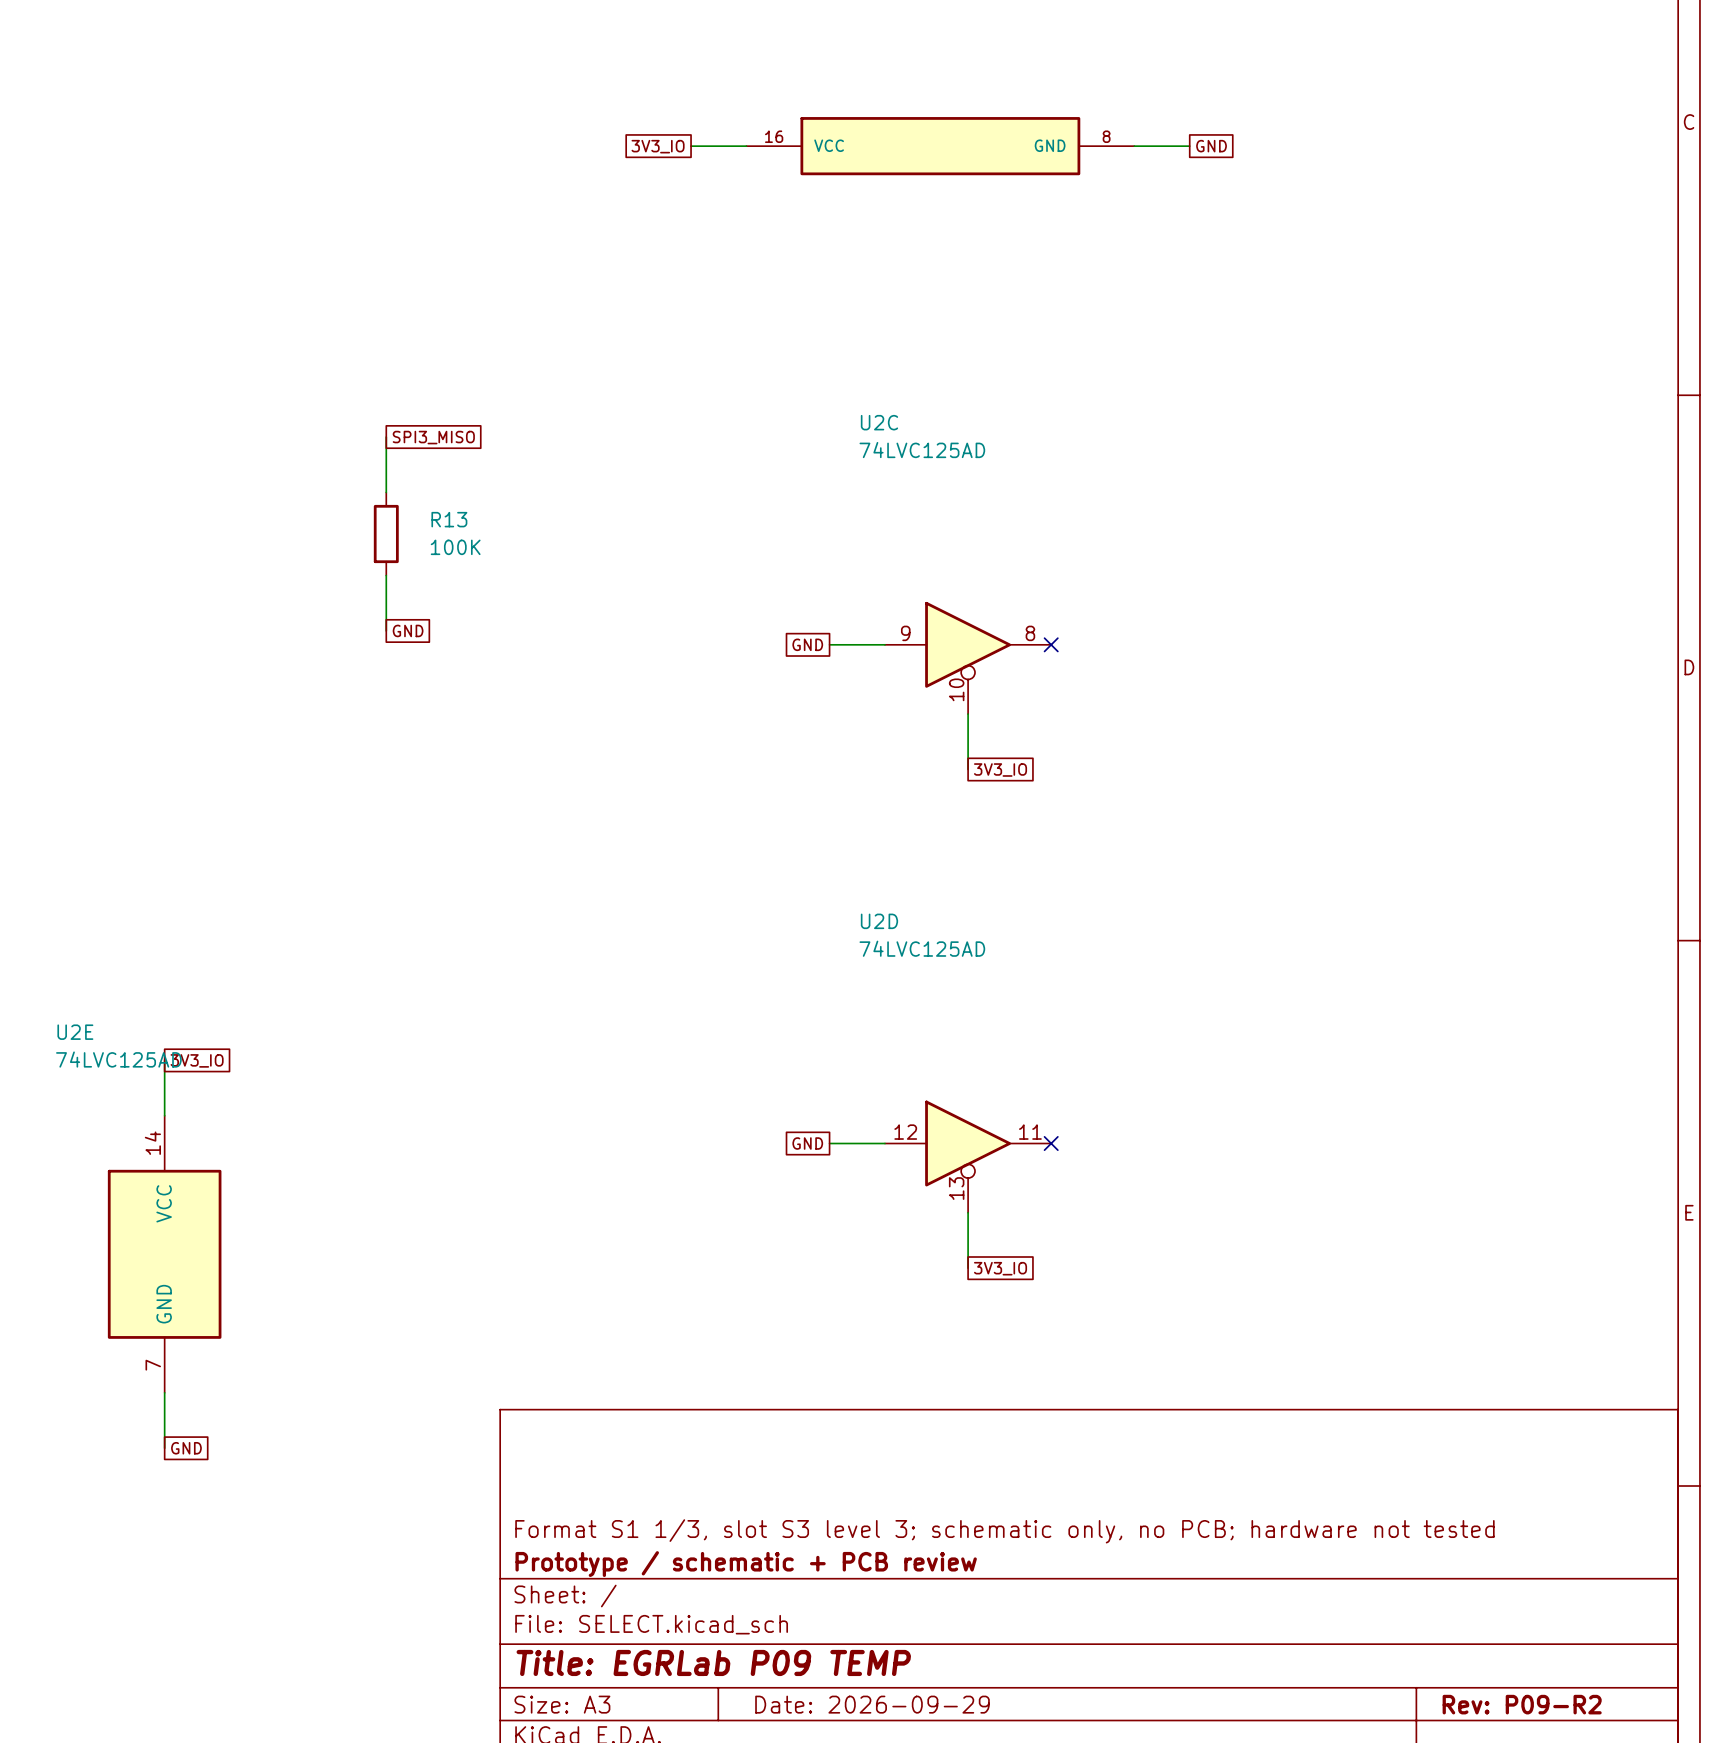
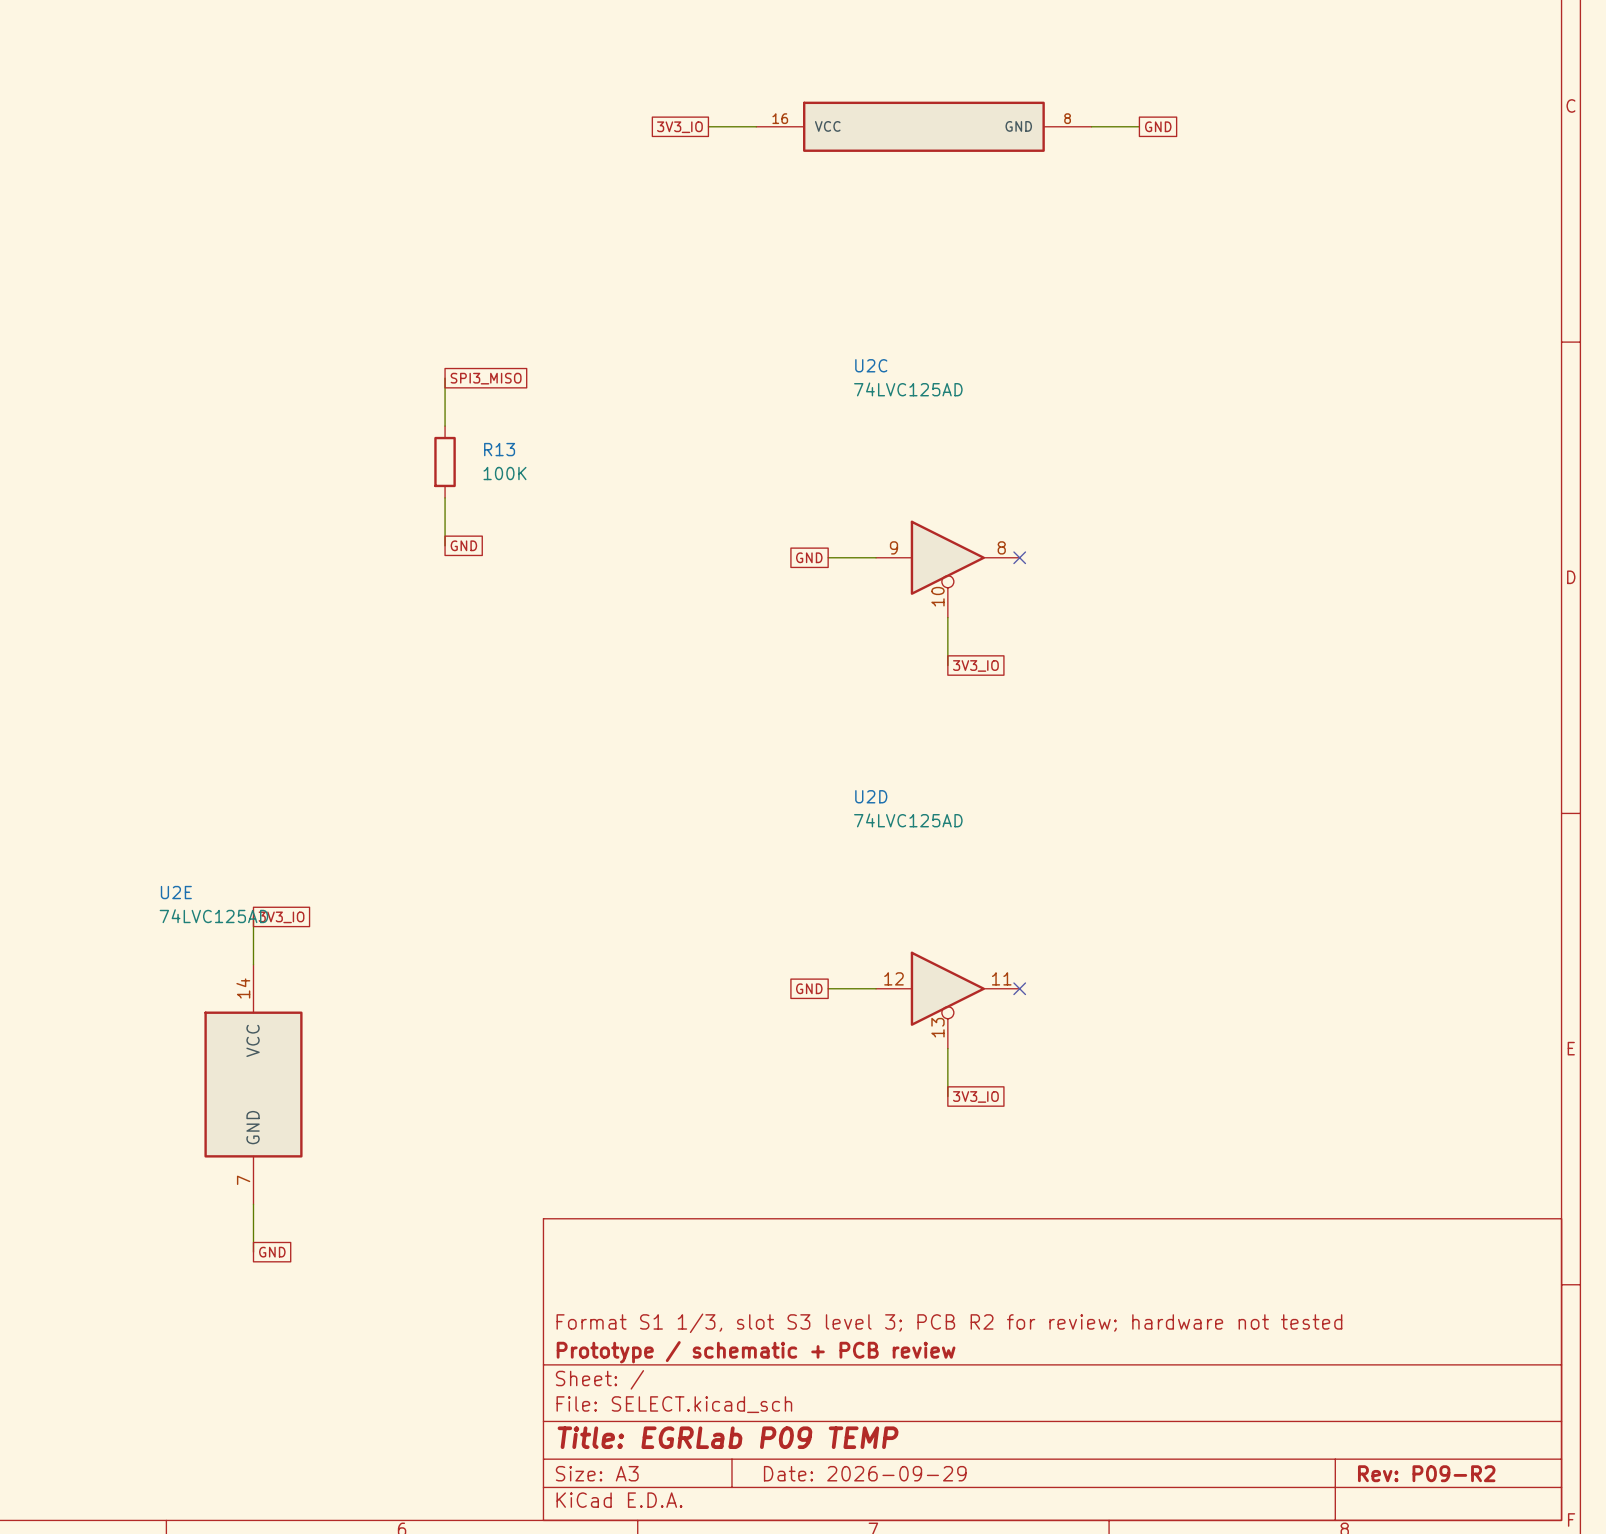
title block: Format S1 1/3, slot S3 level 3; schematic only, no PCB; hardware not tested (1004, 1531) -> Format S1 1/3, slot S3 level 3; PCB R2 for review; hardware not tested (949, 1323)

